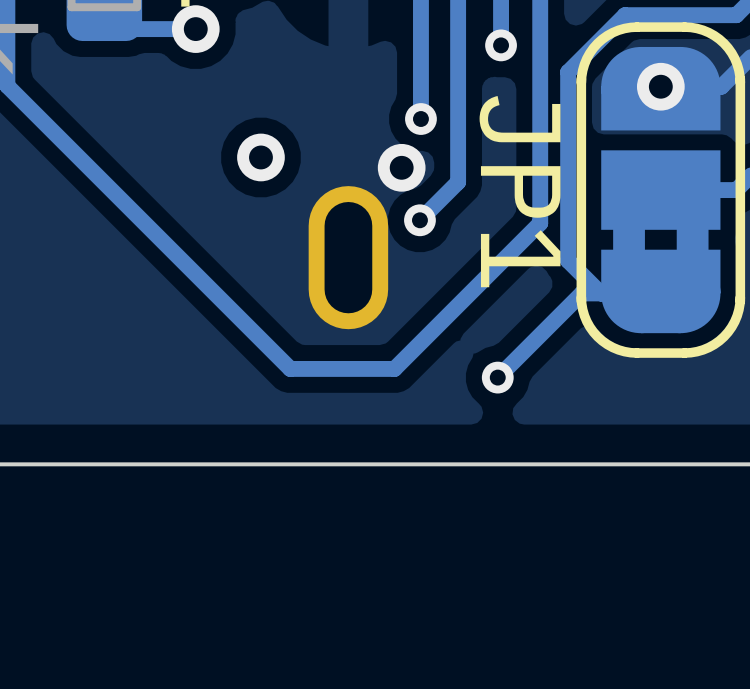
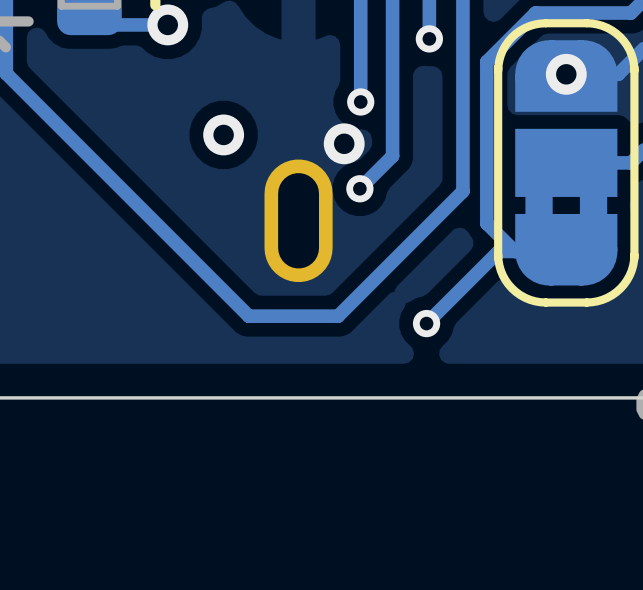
JP1 name: JP1 (520, 191) -> none

